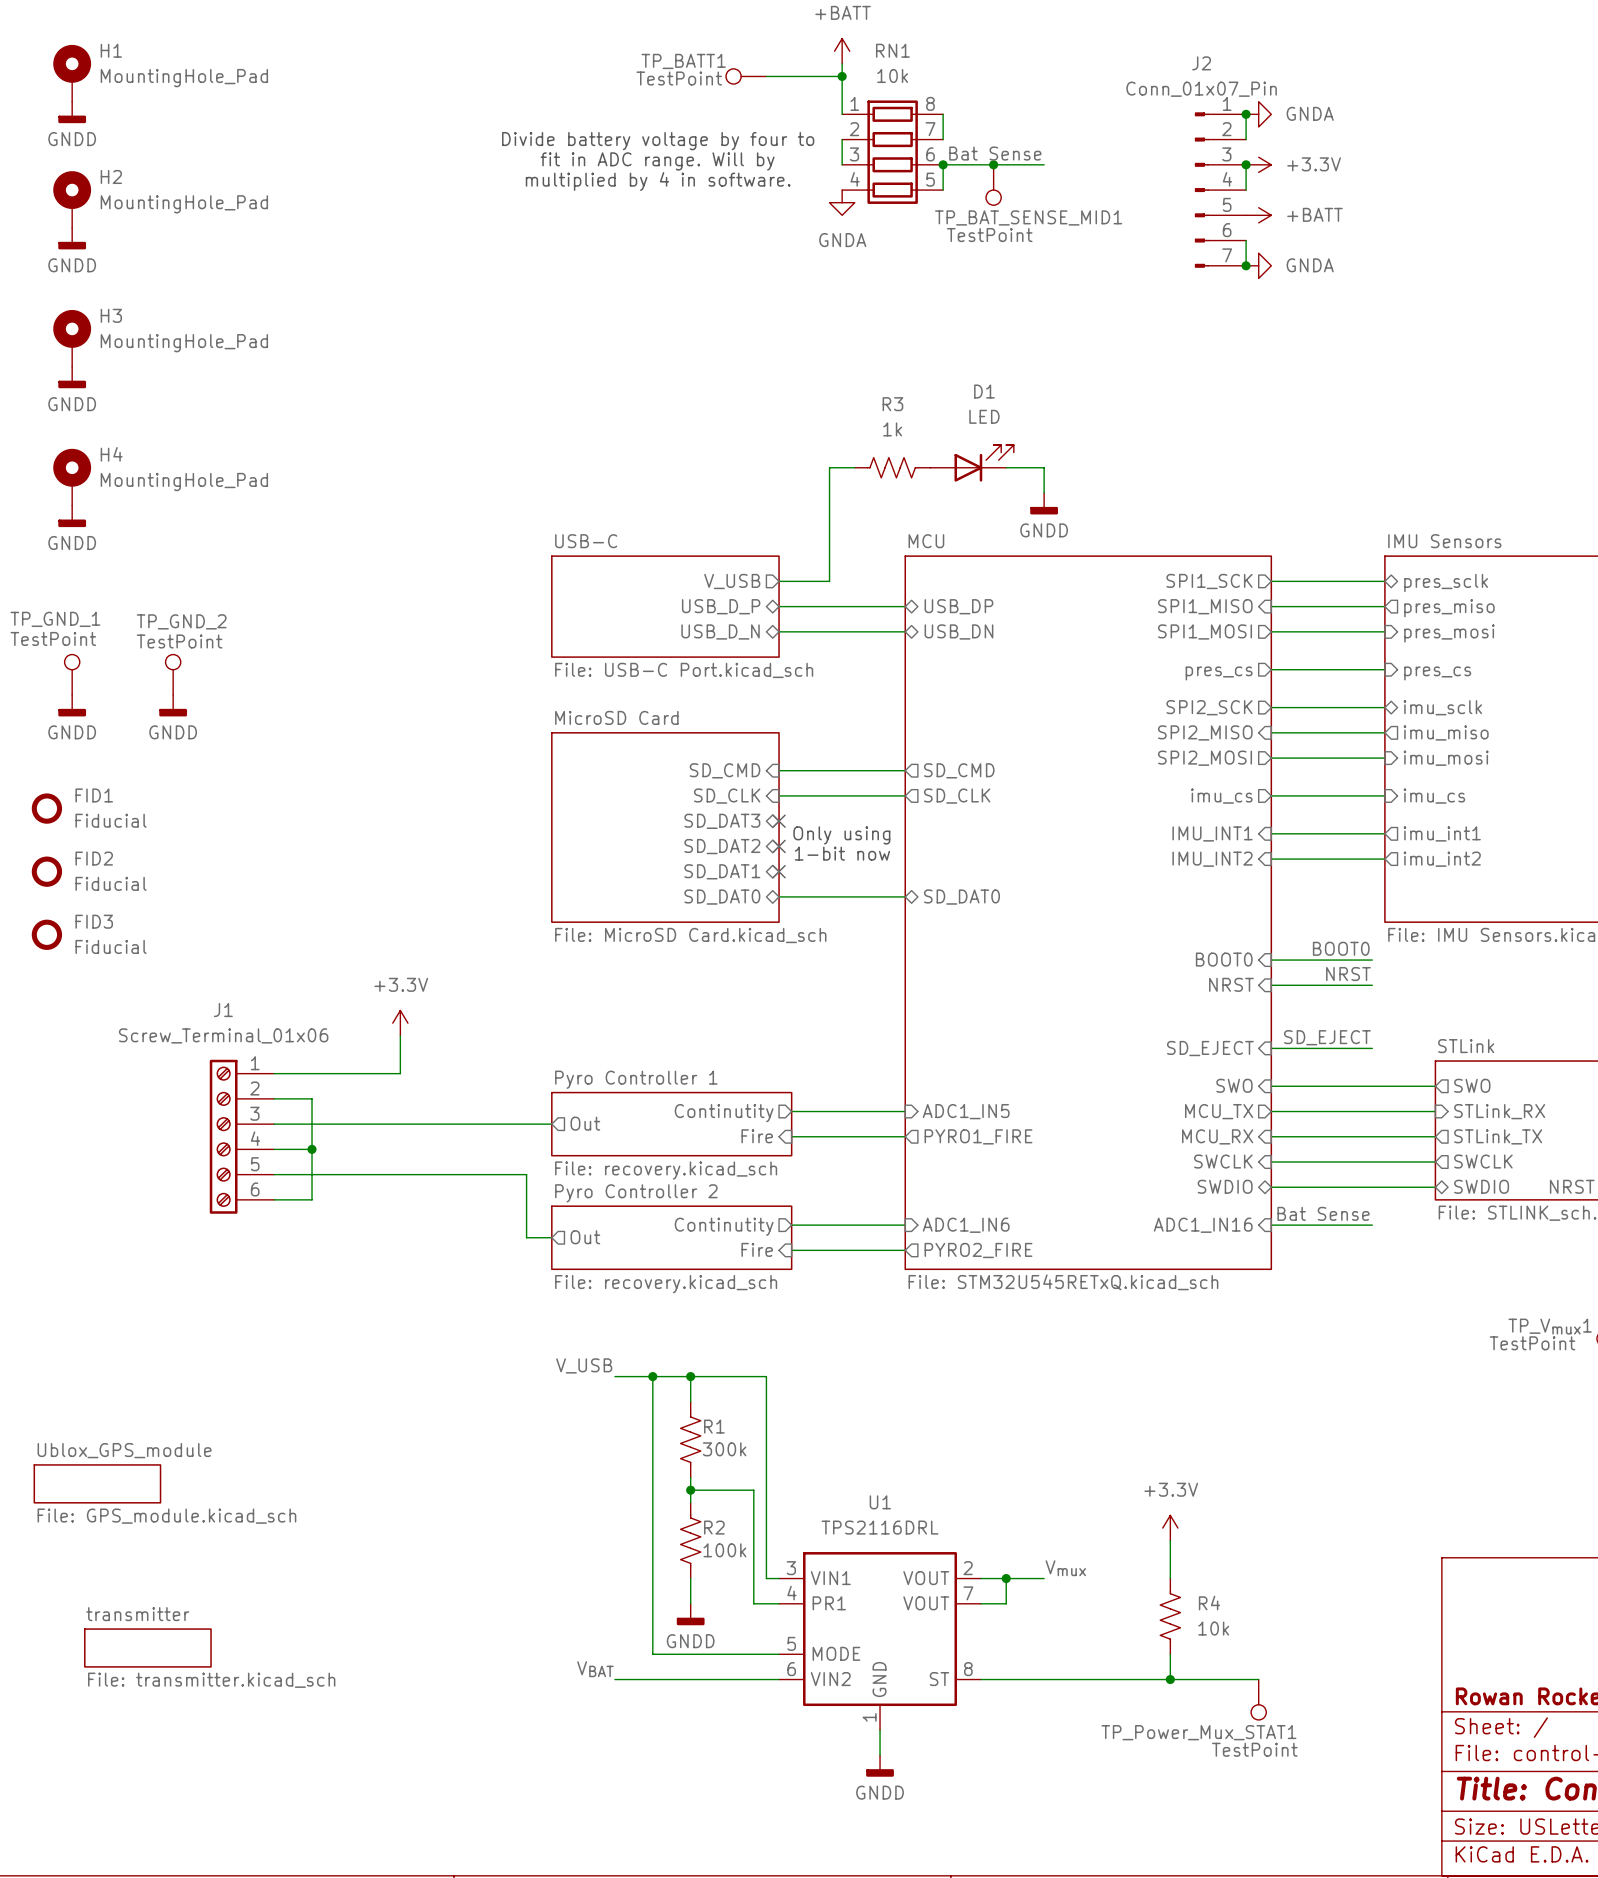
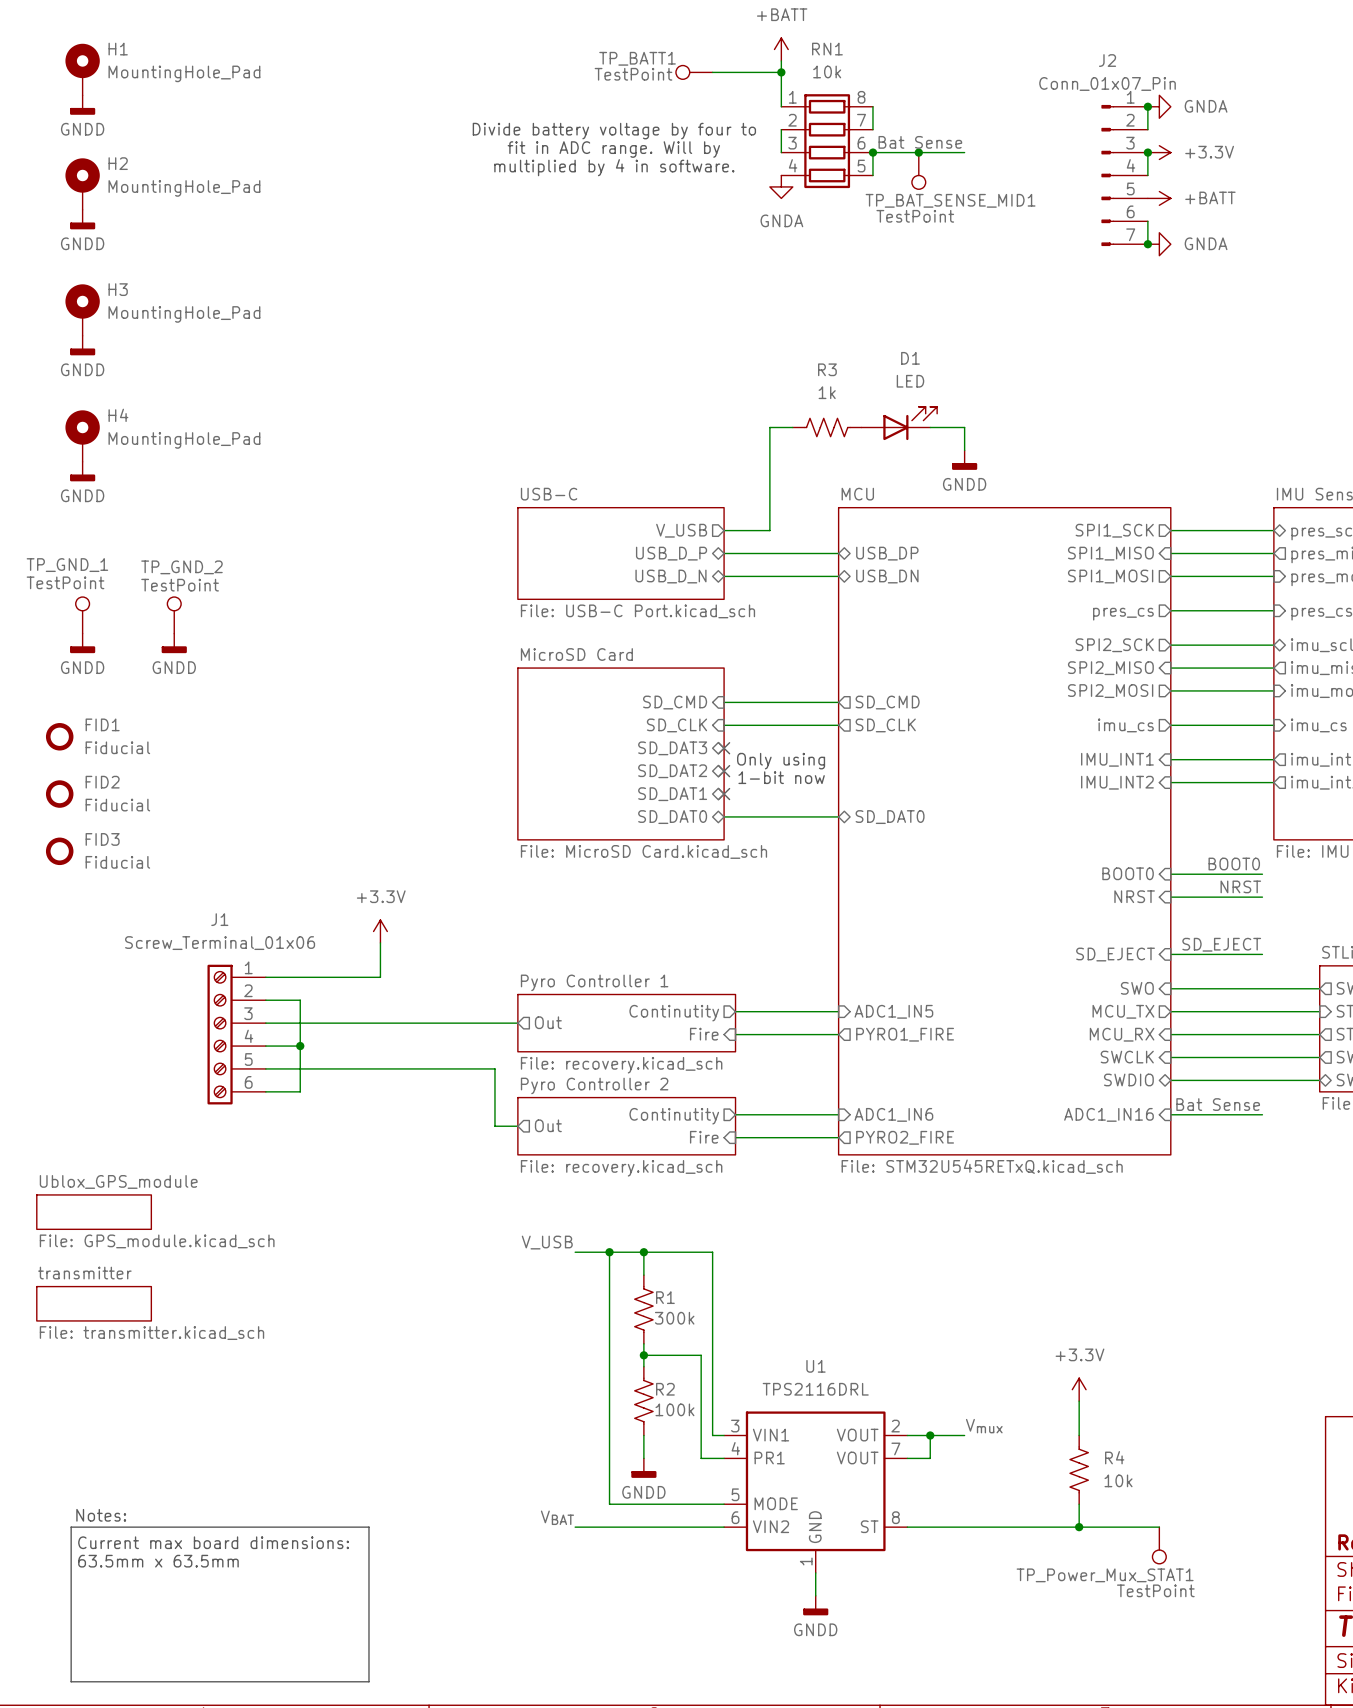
sheet Ublox_GPS_module position: (97, 1483) -> (94, 1212)
sheet transmitter position: (147, 1647) -> (94, 1303)
text: none -> Notes: (101, 1515)
line: none -> (71, 1527) (368, 1527) (368, 1681) (71, 1681) (71, 1527)
text: none -> Current max board dimensions: (213, 1542)
text: none -> 63.5mm x 63.5mm (158, 1561)

